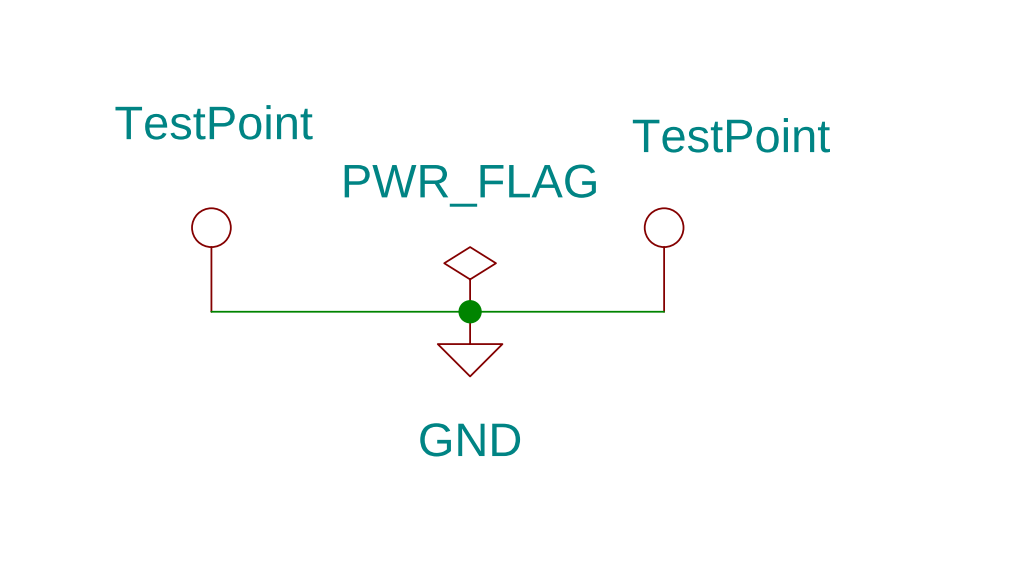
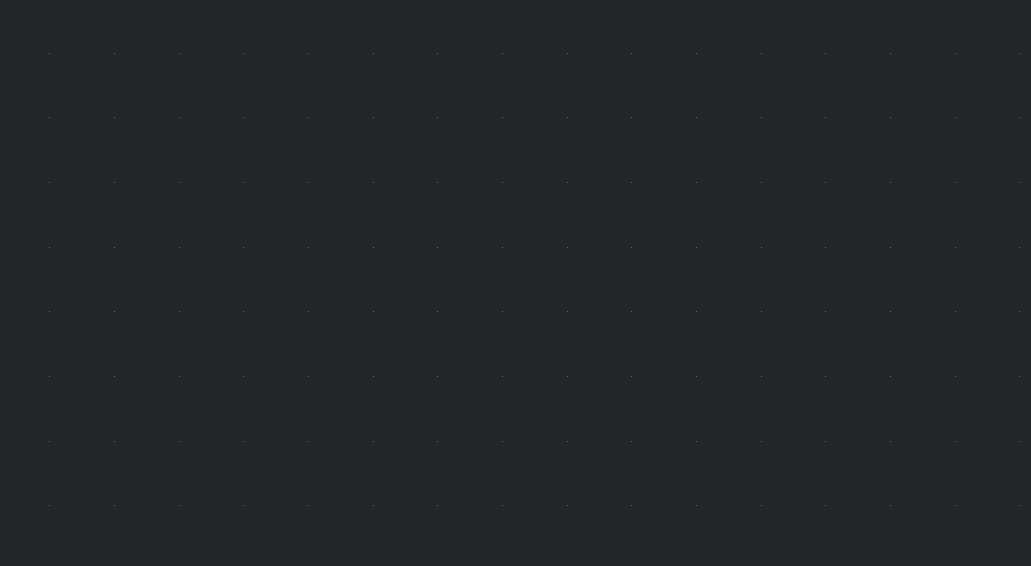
part: TestPoint (211, 260) -> none
part: TestPoint (664, 260) -> none
power symbol: PWR_FLAG (470, 279) -> none
wire: (211, 311) (664, 311) -> none
junction: (470, 311) -> none
power symbol: GND (470, 344) -> none

